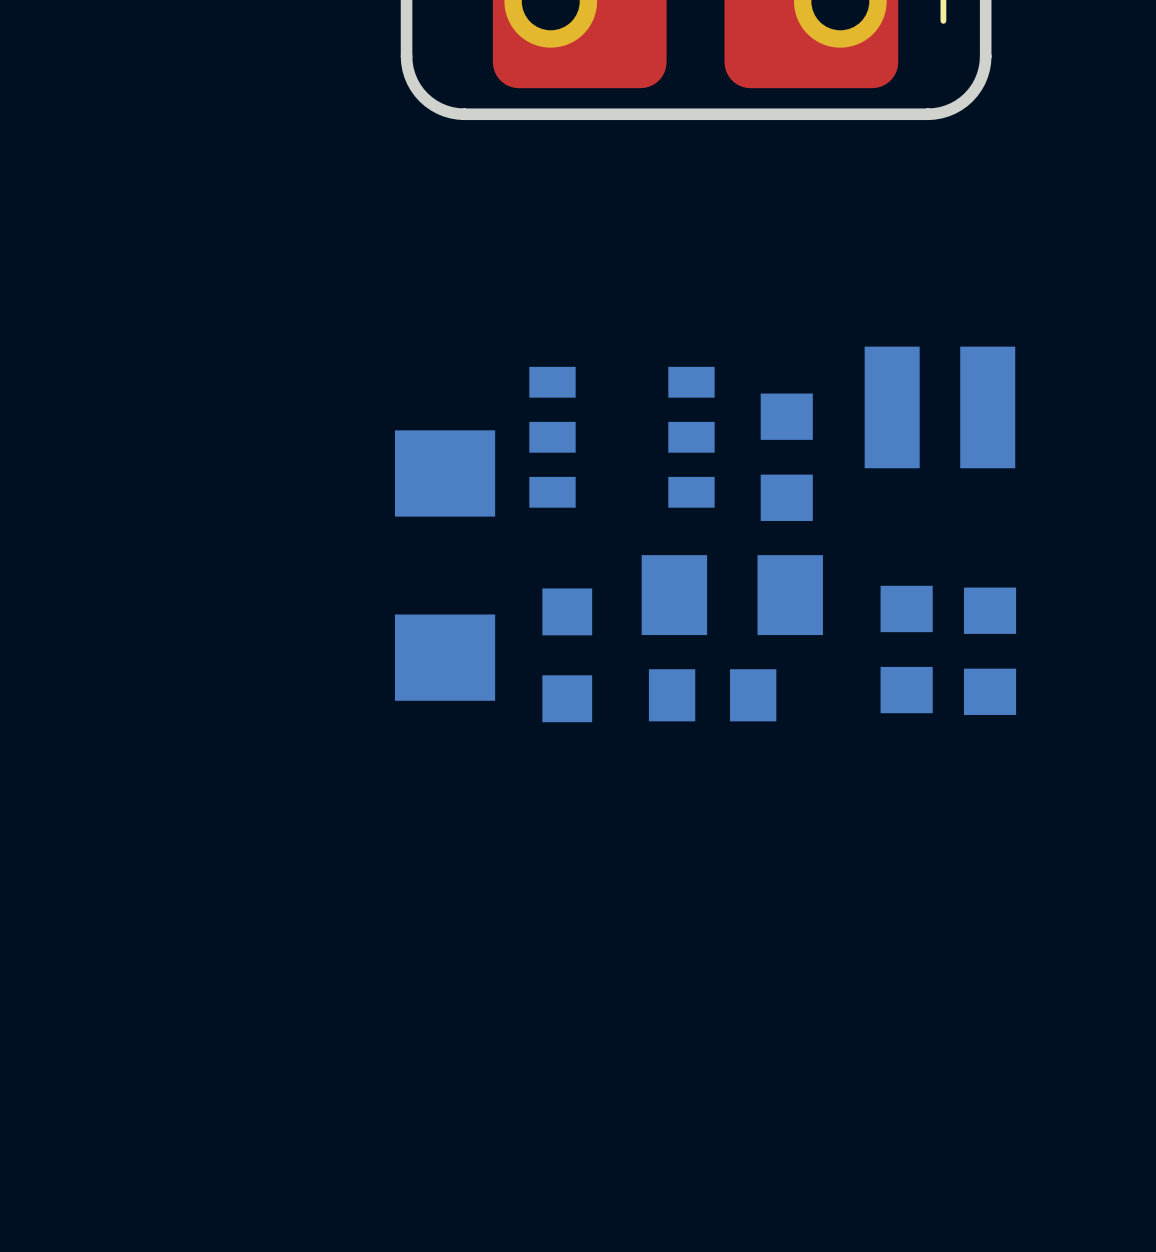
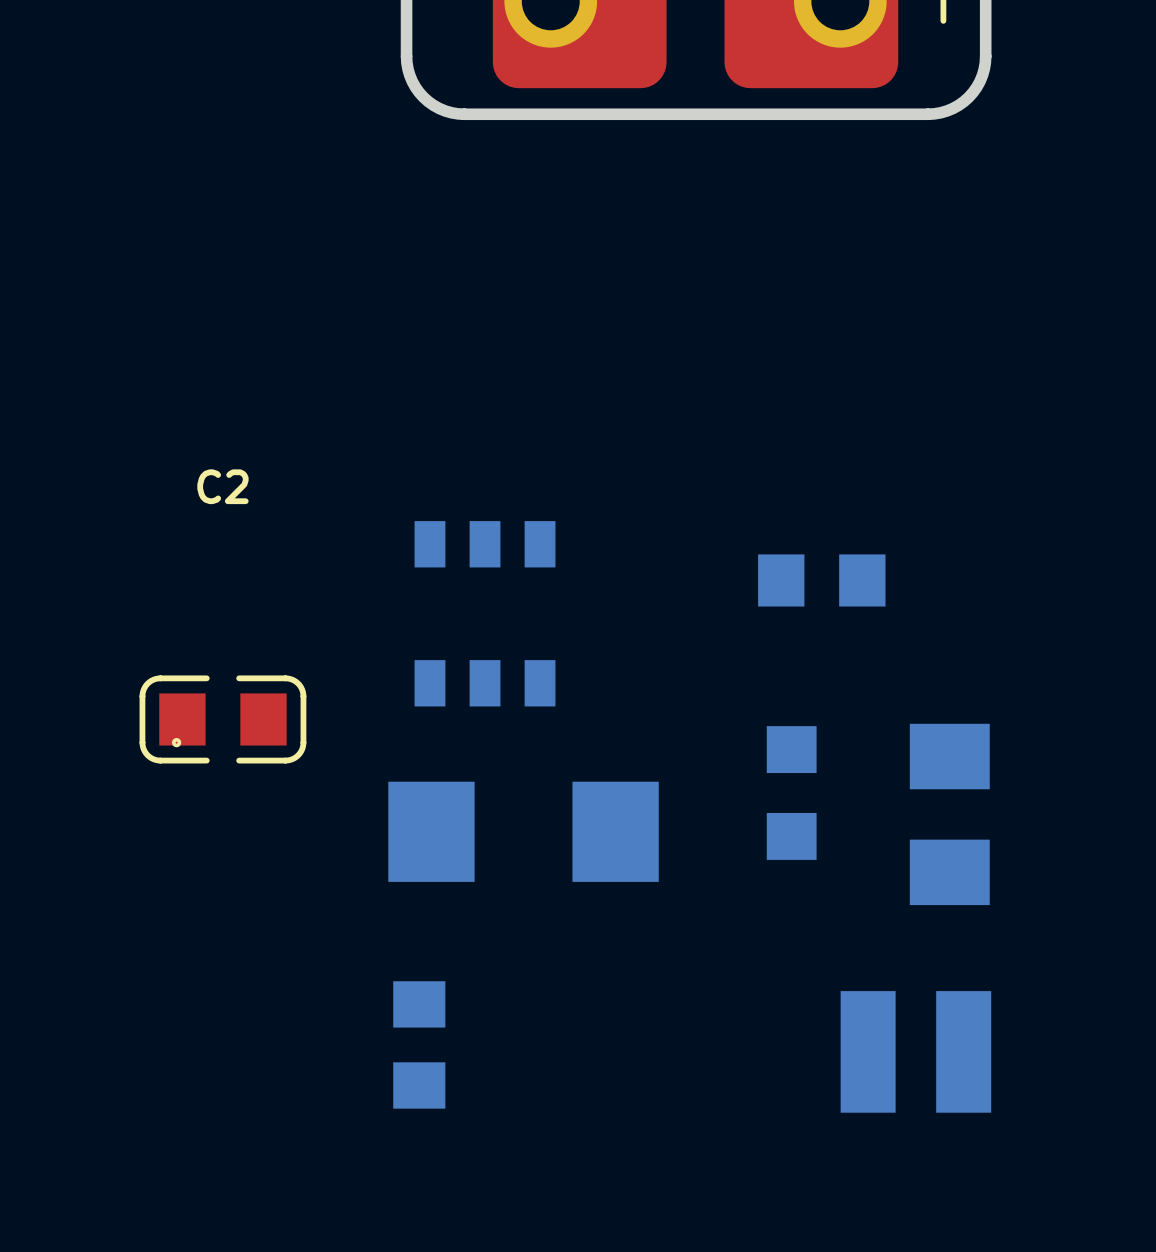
part position: (939, 407) -> (915, 1051)
part rotation: 0° (621, 437) -> 90° clockwise (485, 613)
part position: (621, 437) -> (485, 613)
C2 side: bottom (786, 457) -> top (222, 719)
part rotation: 0° (445, 565) -> 90° clockwise (523, 831)
part position: (445, 565) -> (523, 831)
part: none -> (821, 580)
part rotation: 0° (732, 595) -> 90° clockwise (949, 814)
part position: (732, 595) -> (949, 814)
part: (906, 649) -> none
part: (990, 651) -> none
part position: (567, 655) -> (791, 793)
part: (712, 695) -> none
part: none -> (419, 1044)

